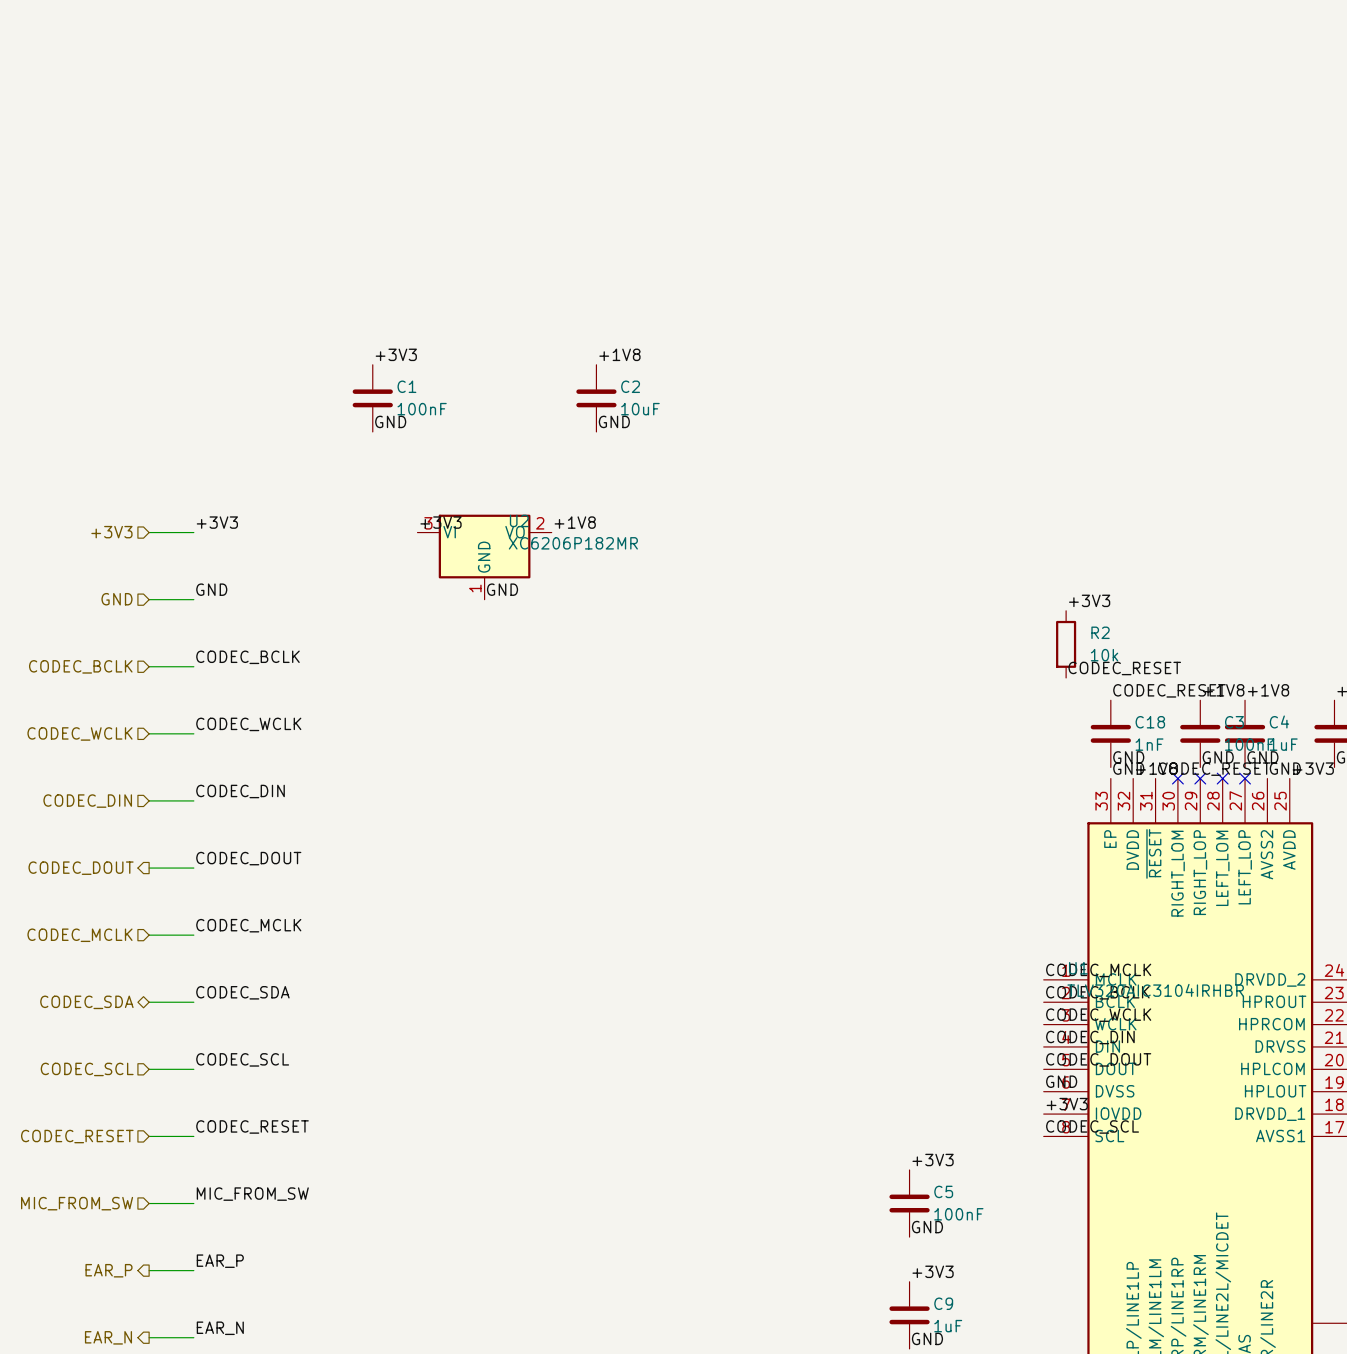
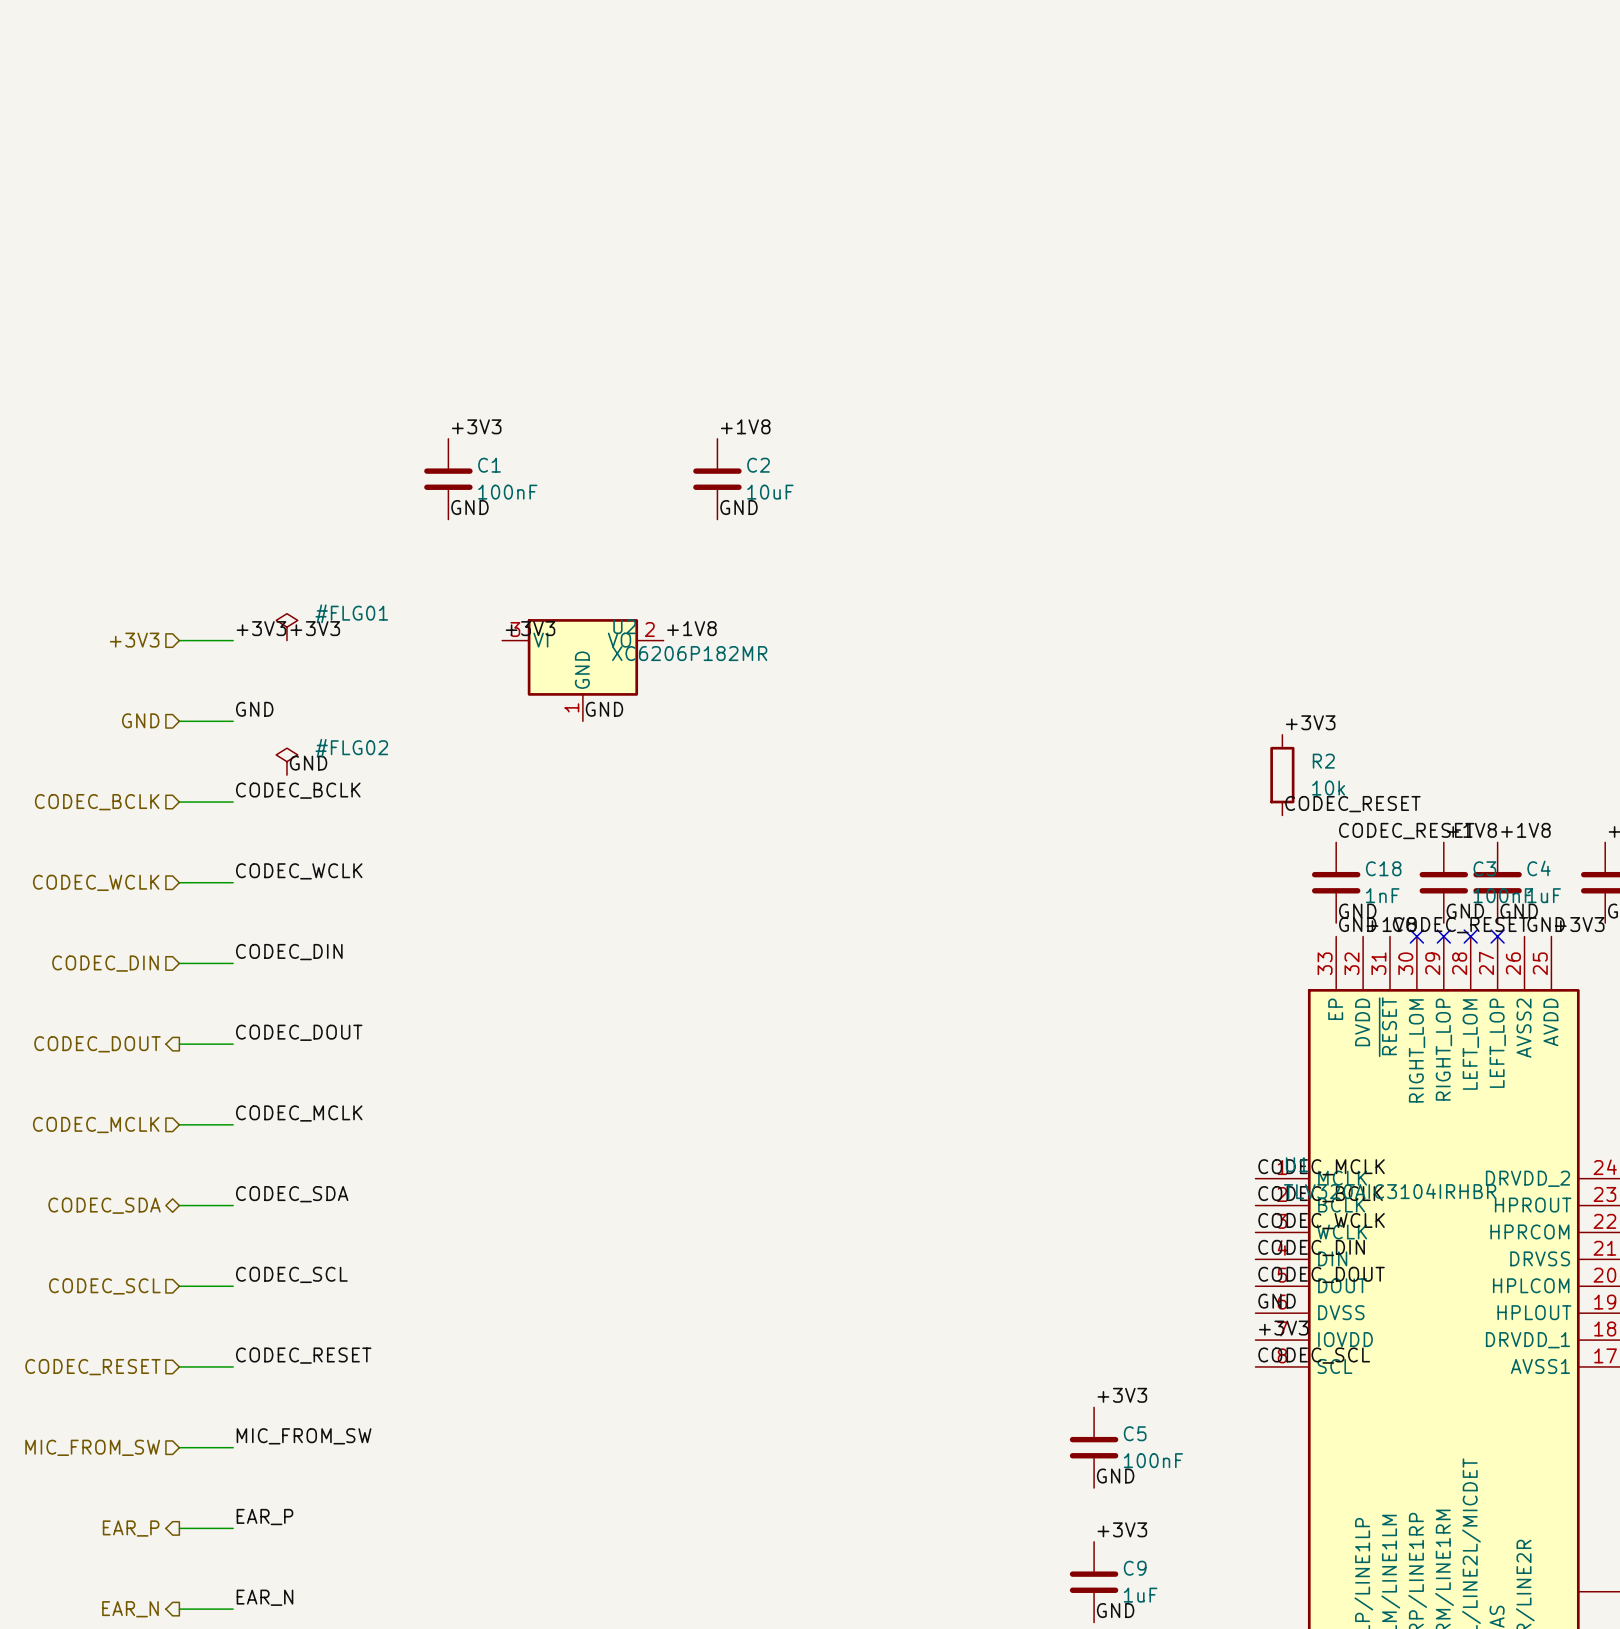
#FLG01: none -> (286, 627)
label: none -> +3V3 (315, 628)
#FLG02: none -> (286, 761)
label: none -> GND (308, 763)

